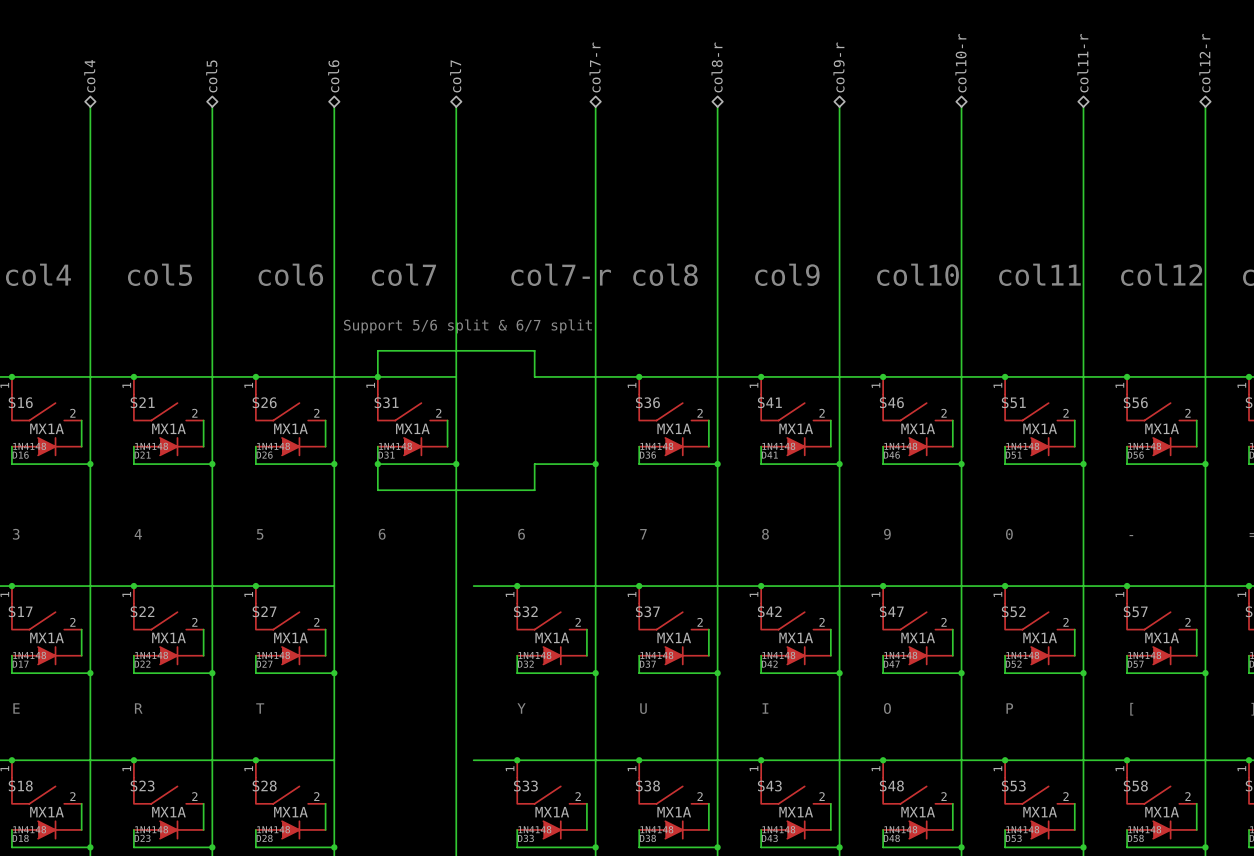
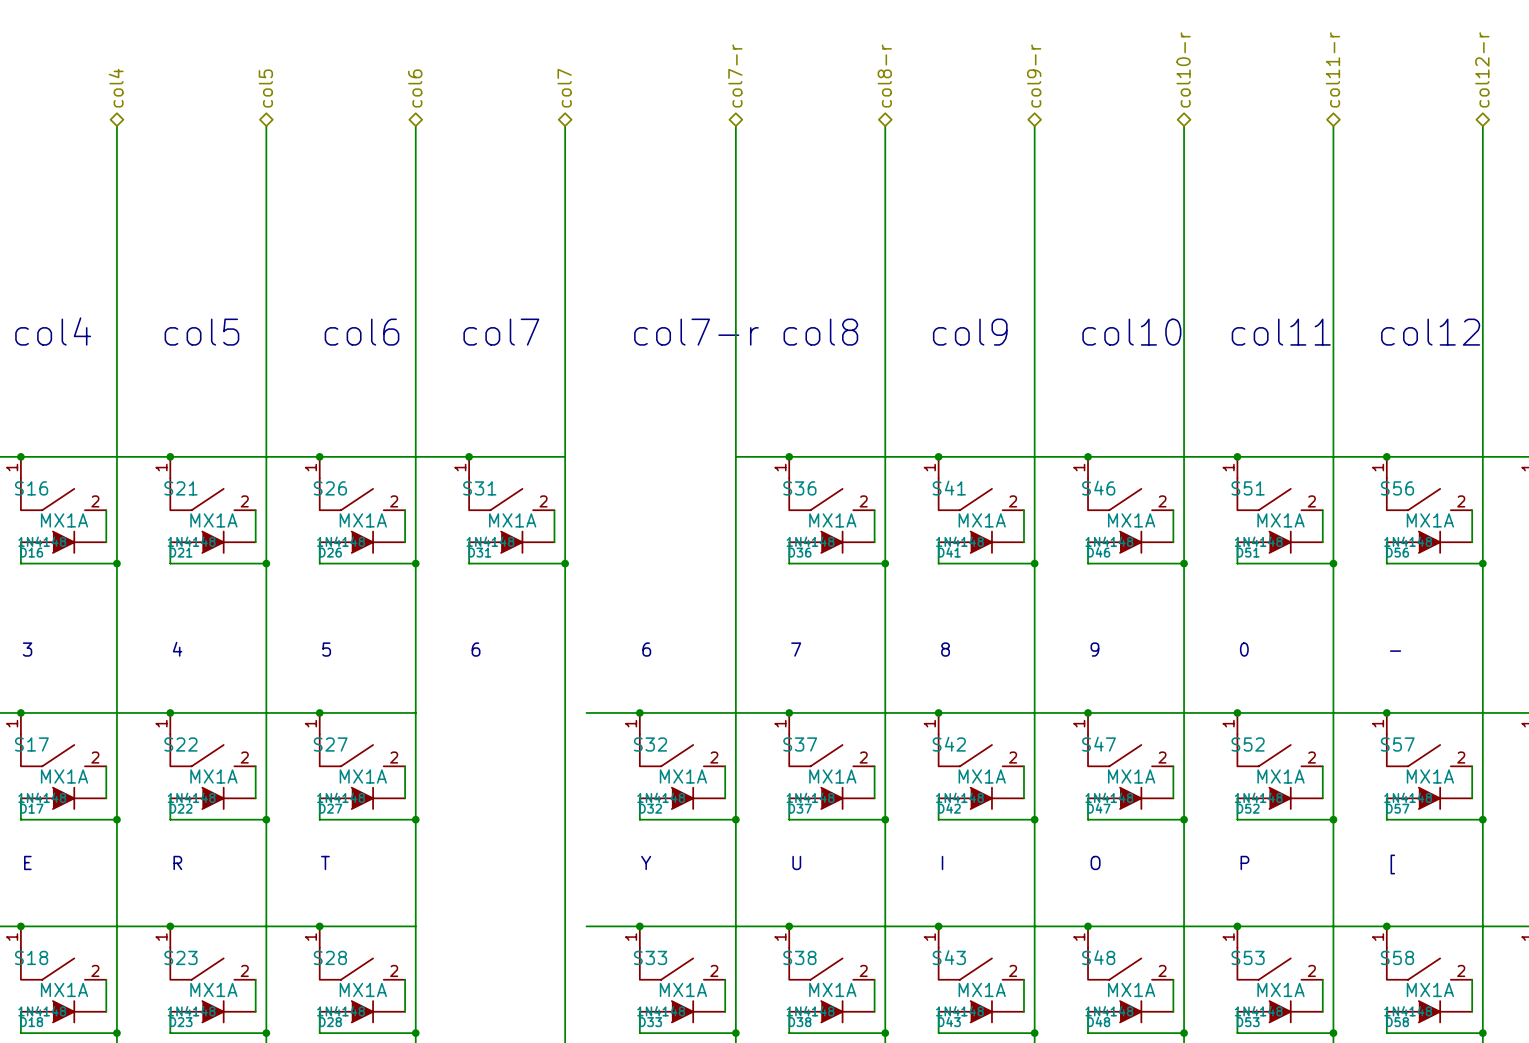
text: Support 5/6 split & 6/7 split (467, 326) -> none
wire: (377, 376) (377, 350) (534, 350) (534, 376) (595, 376) -> none
wire: (377, 464) (377, 490) (534, 490) (534, 464) (595, 464) -> none
junction: (377, 464) -> none
junction: (595, 464) -> none

